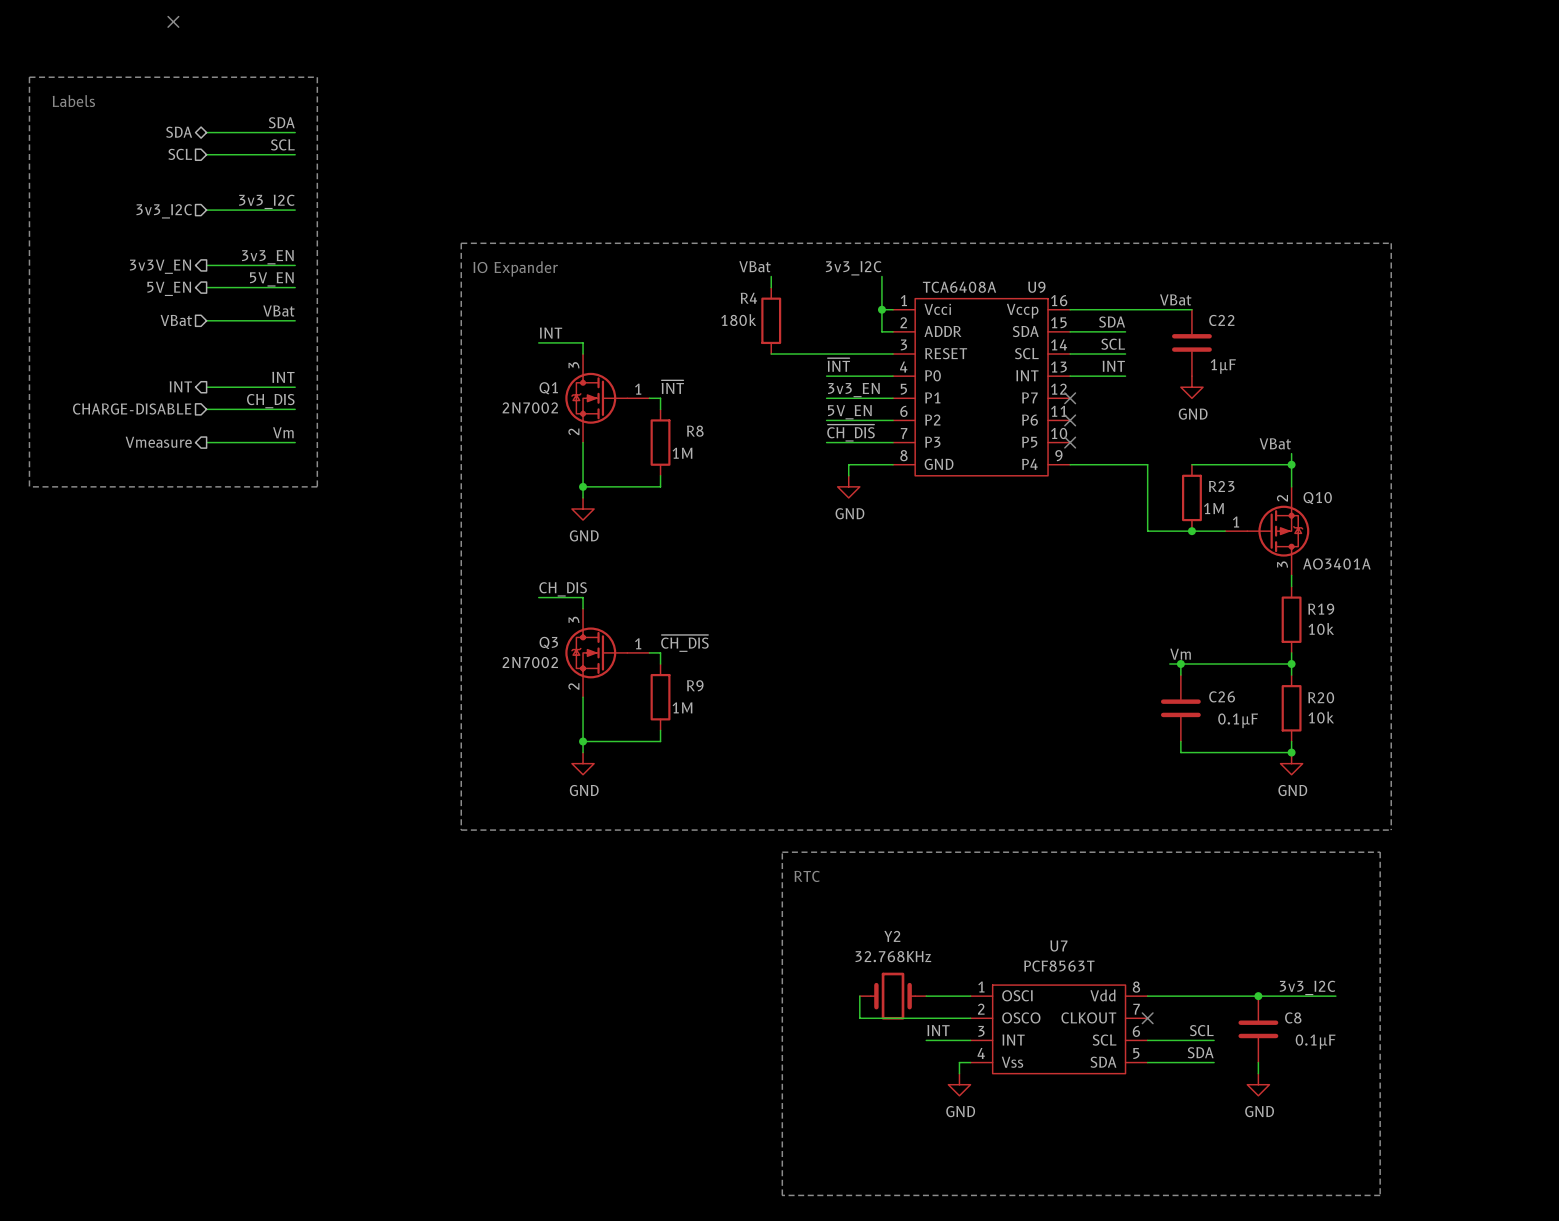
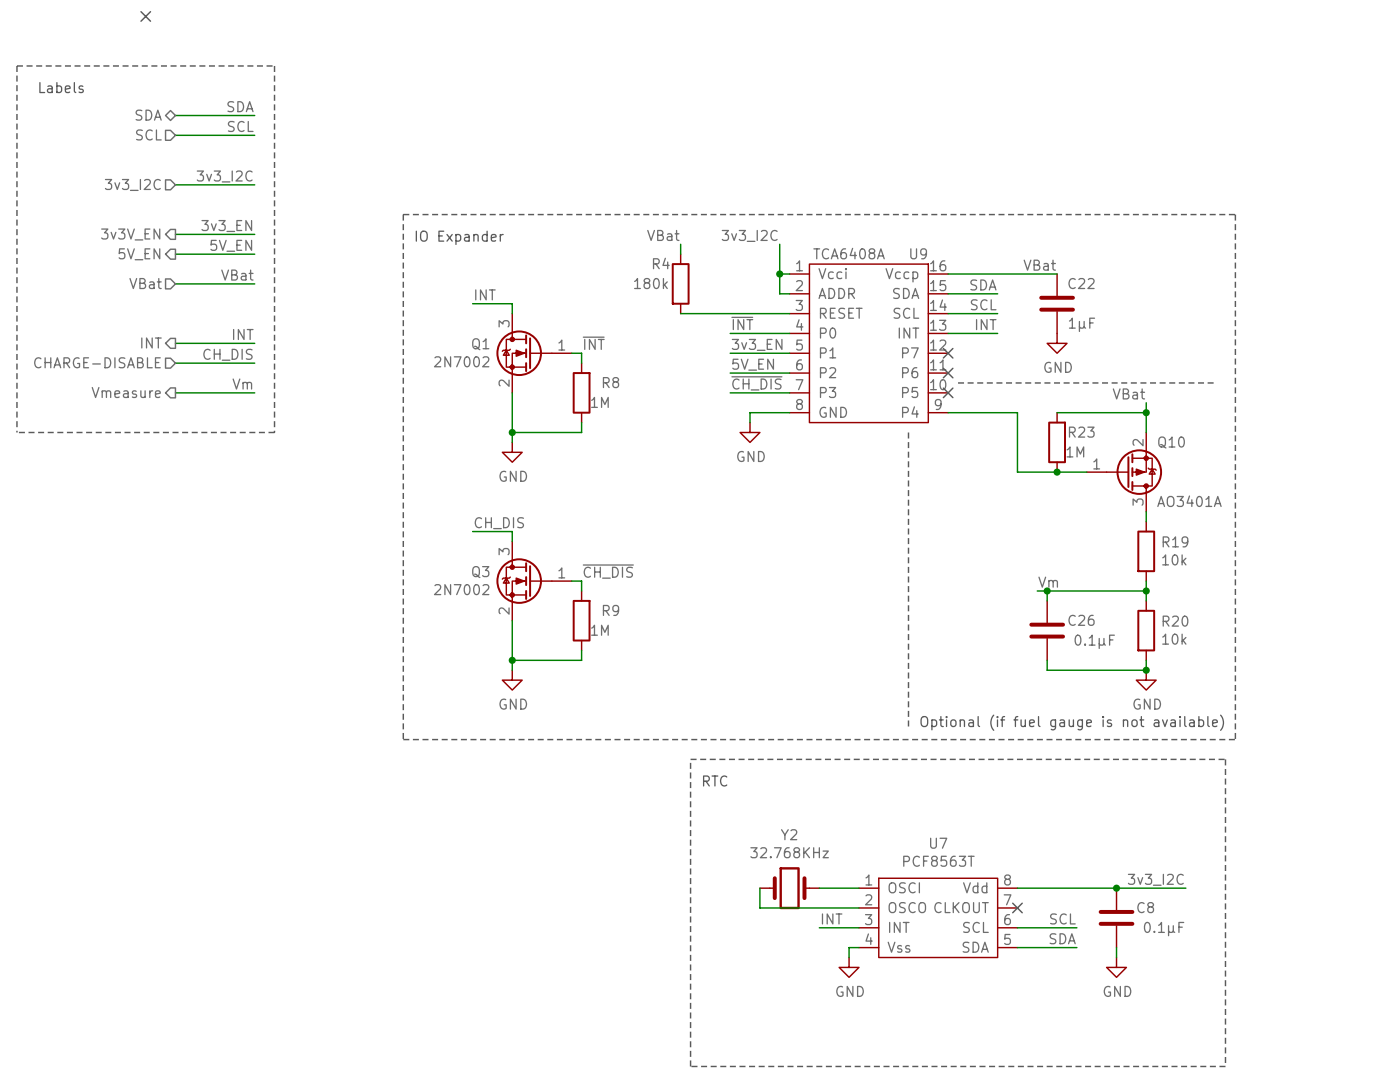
line: none -> (958, 382) (1215, 382)
line: none -> (908, 432) (908, 729)
text: none -> Optional (if fuel gauge is not available) (1072, 722)

